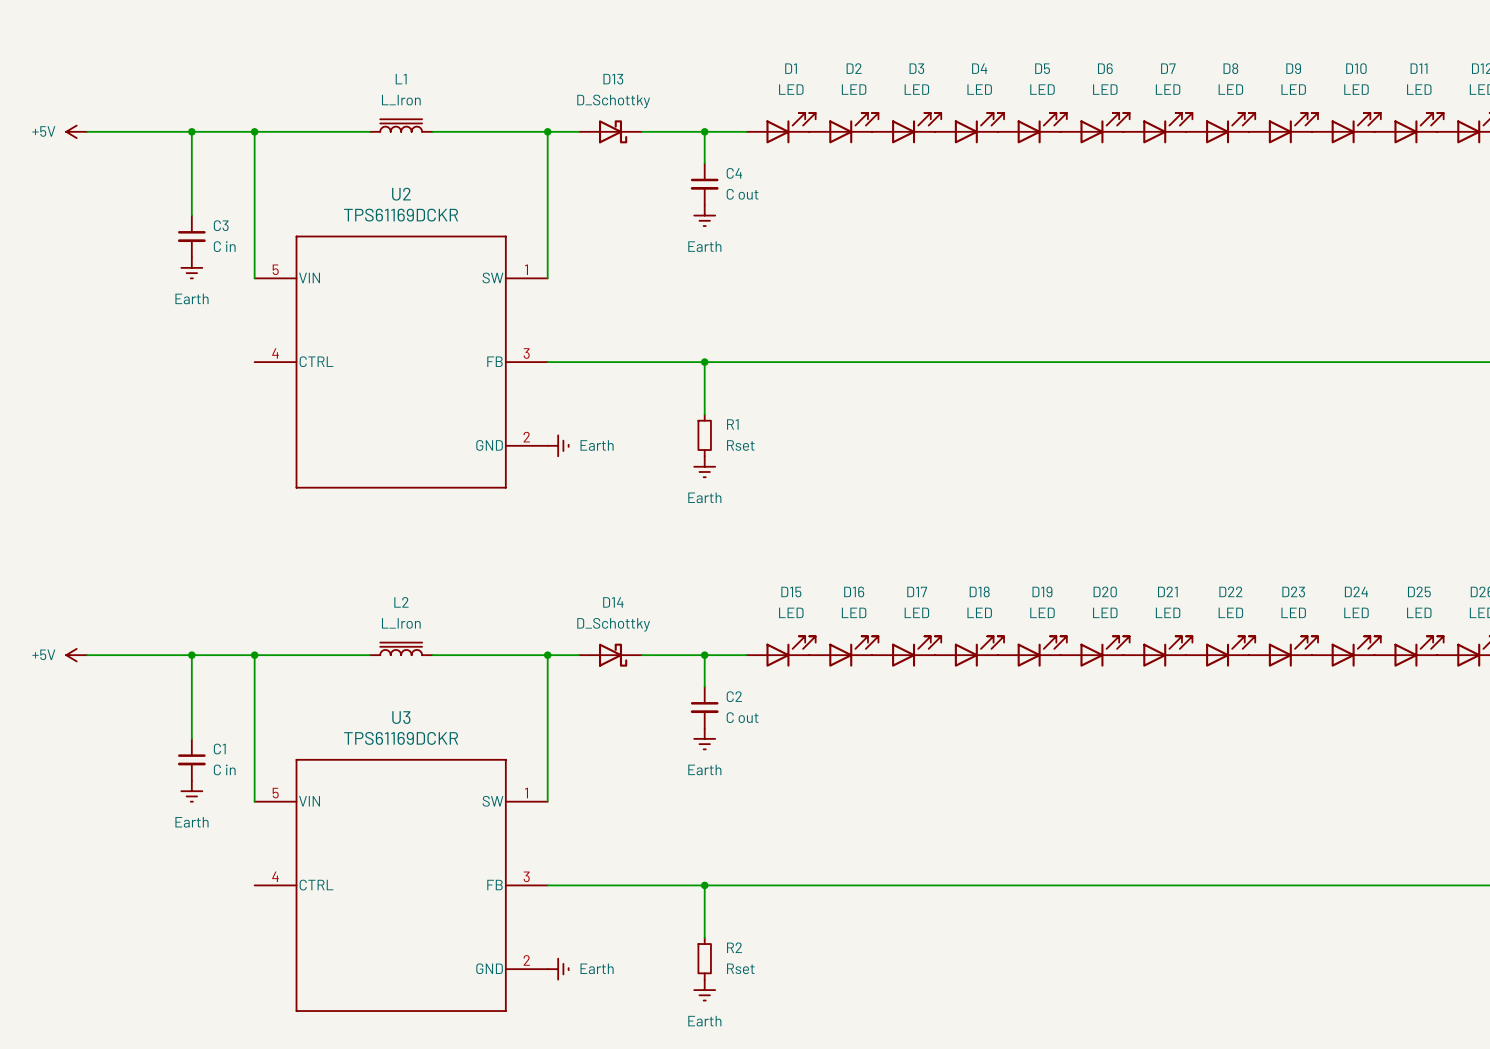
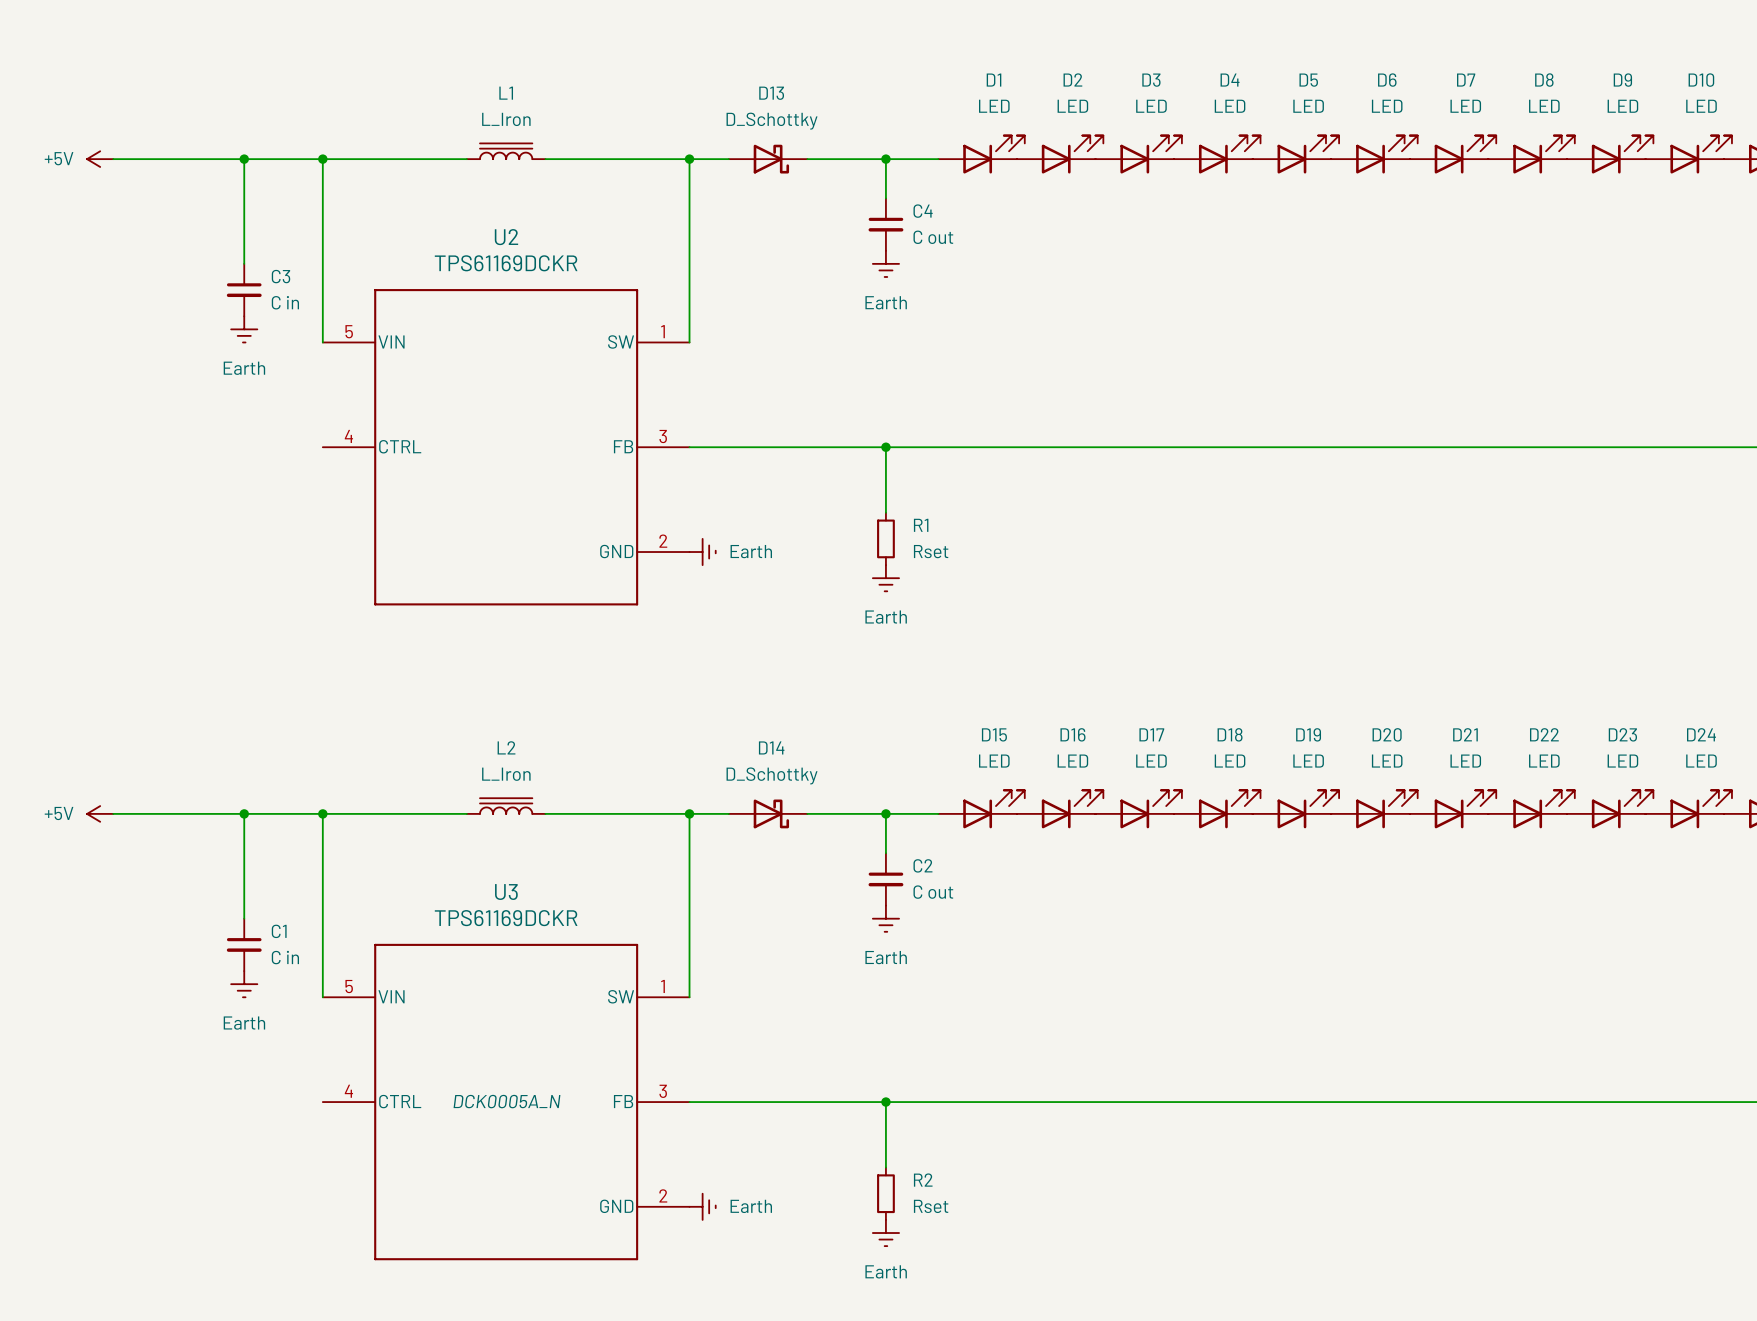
U3 text: none -> DCK0005A_N (506, 1101)

